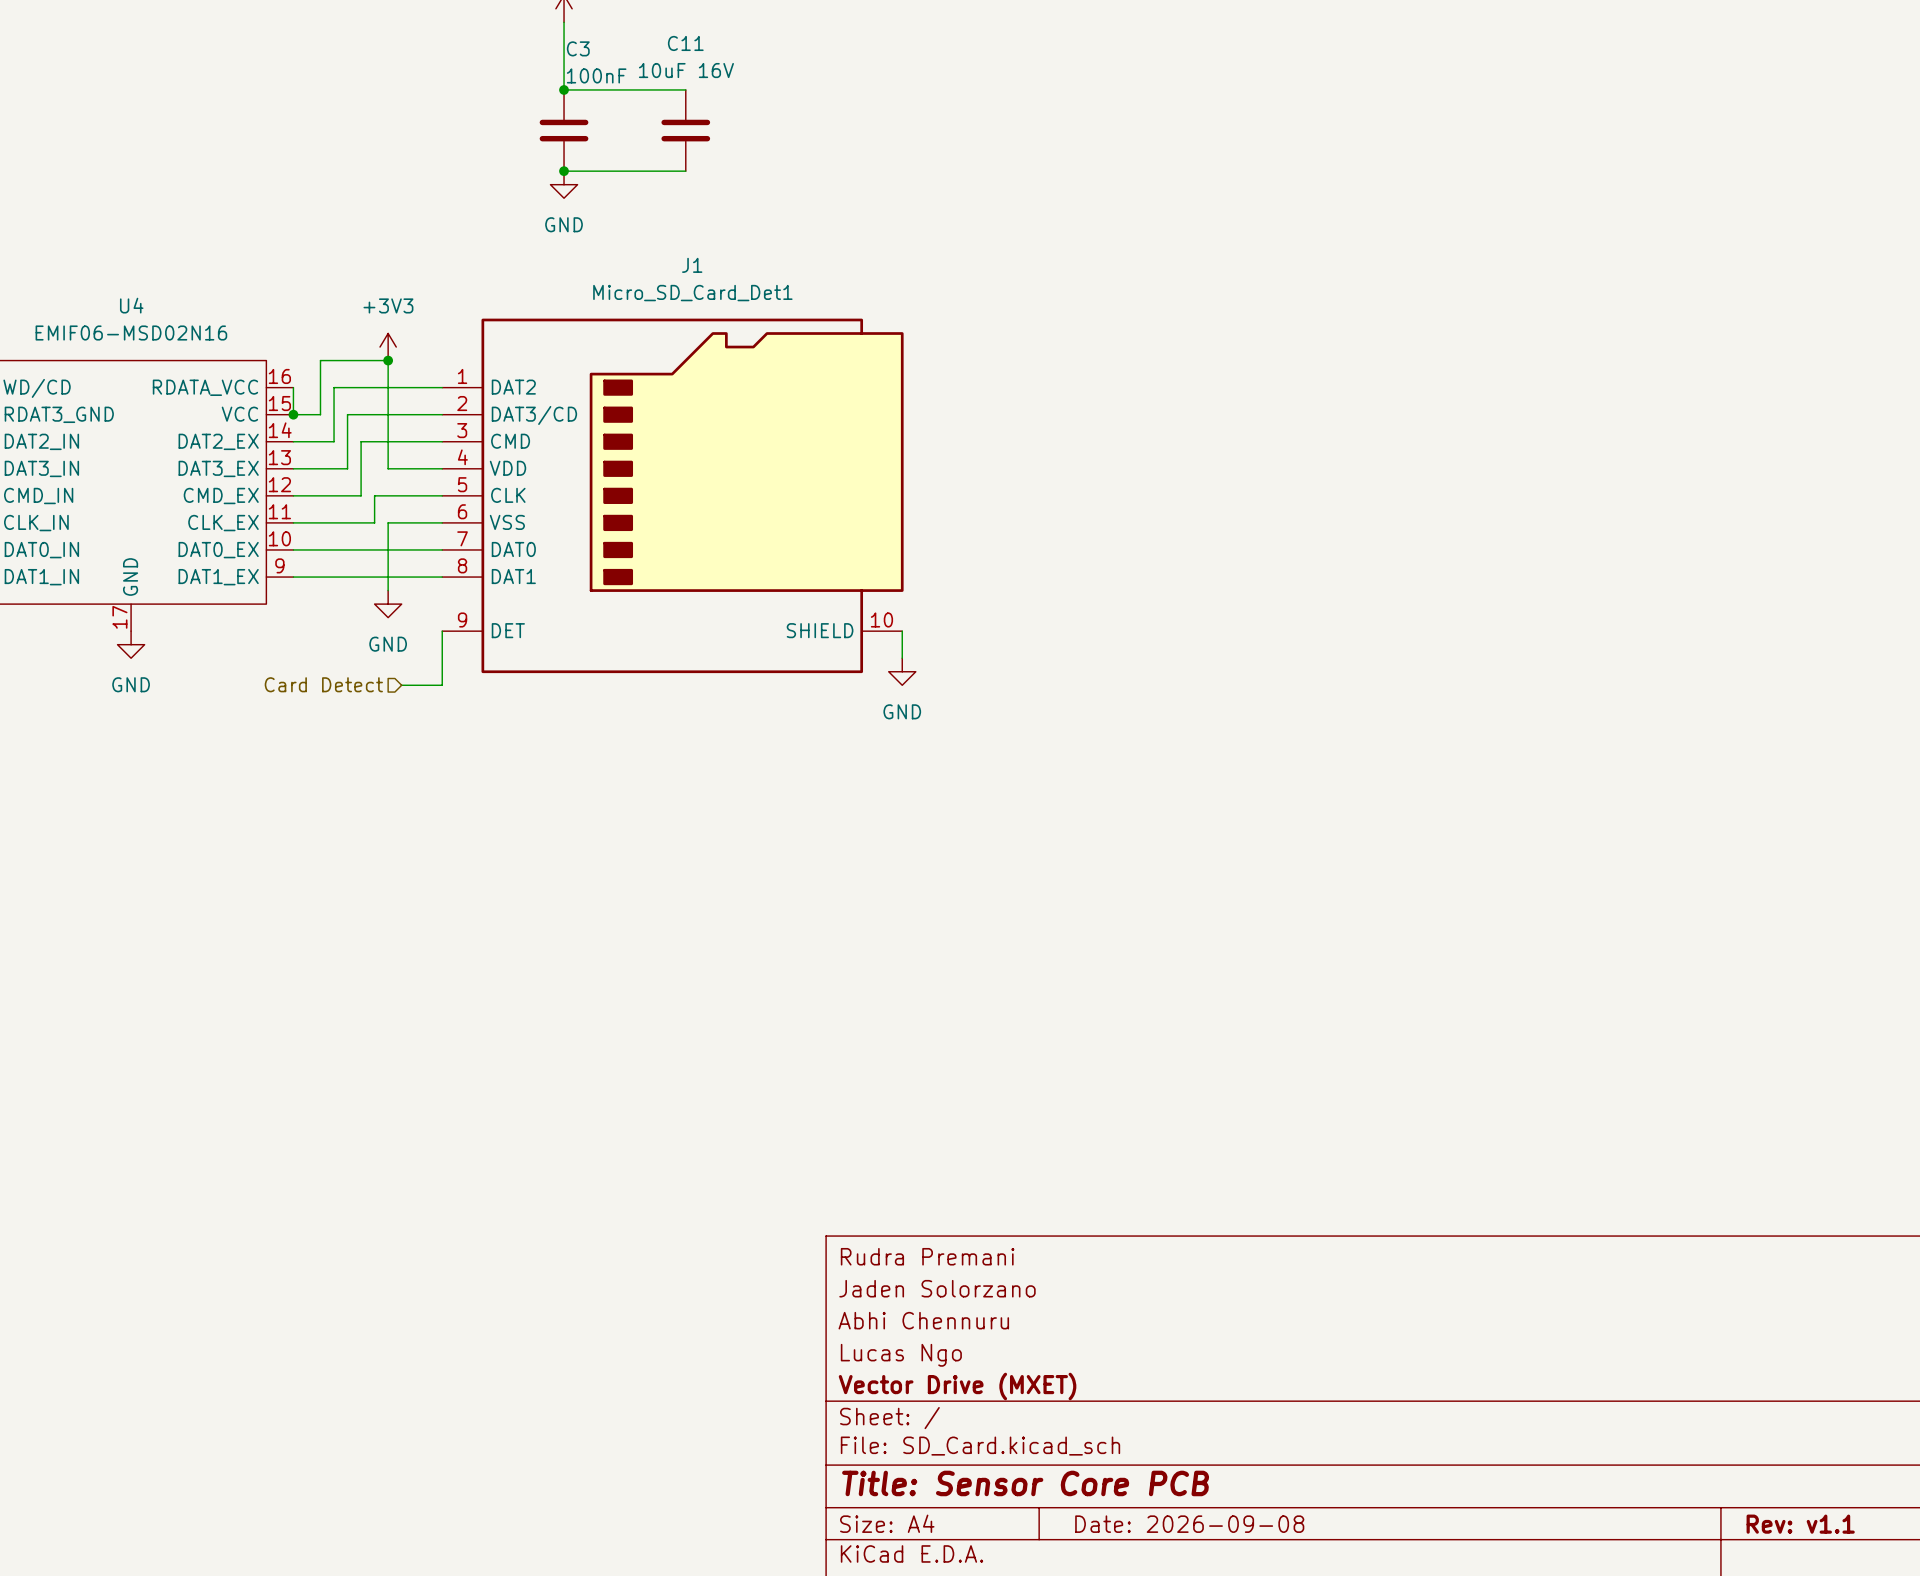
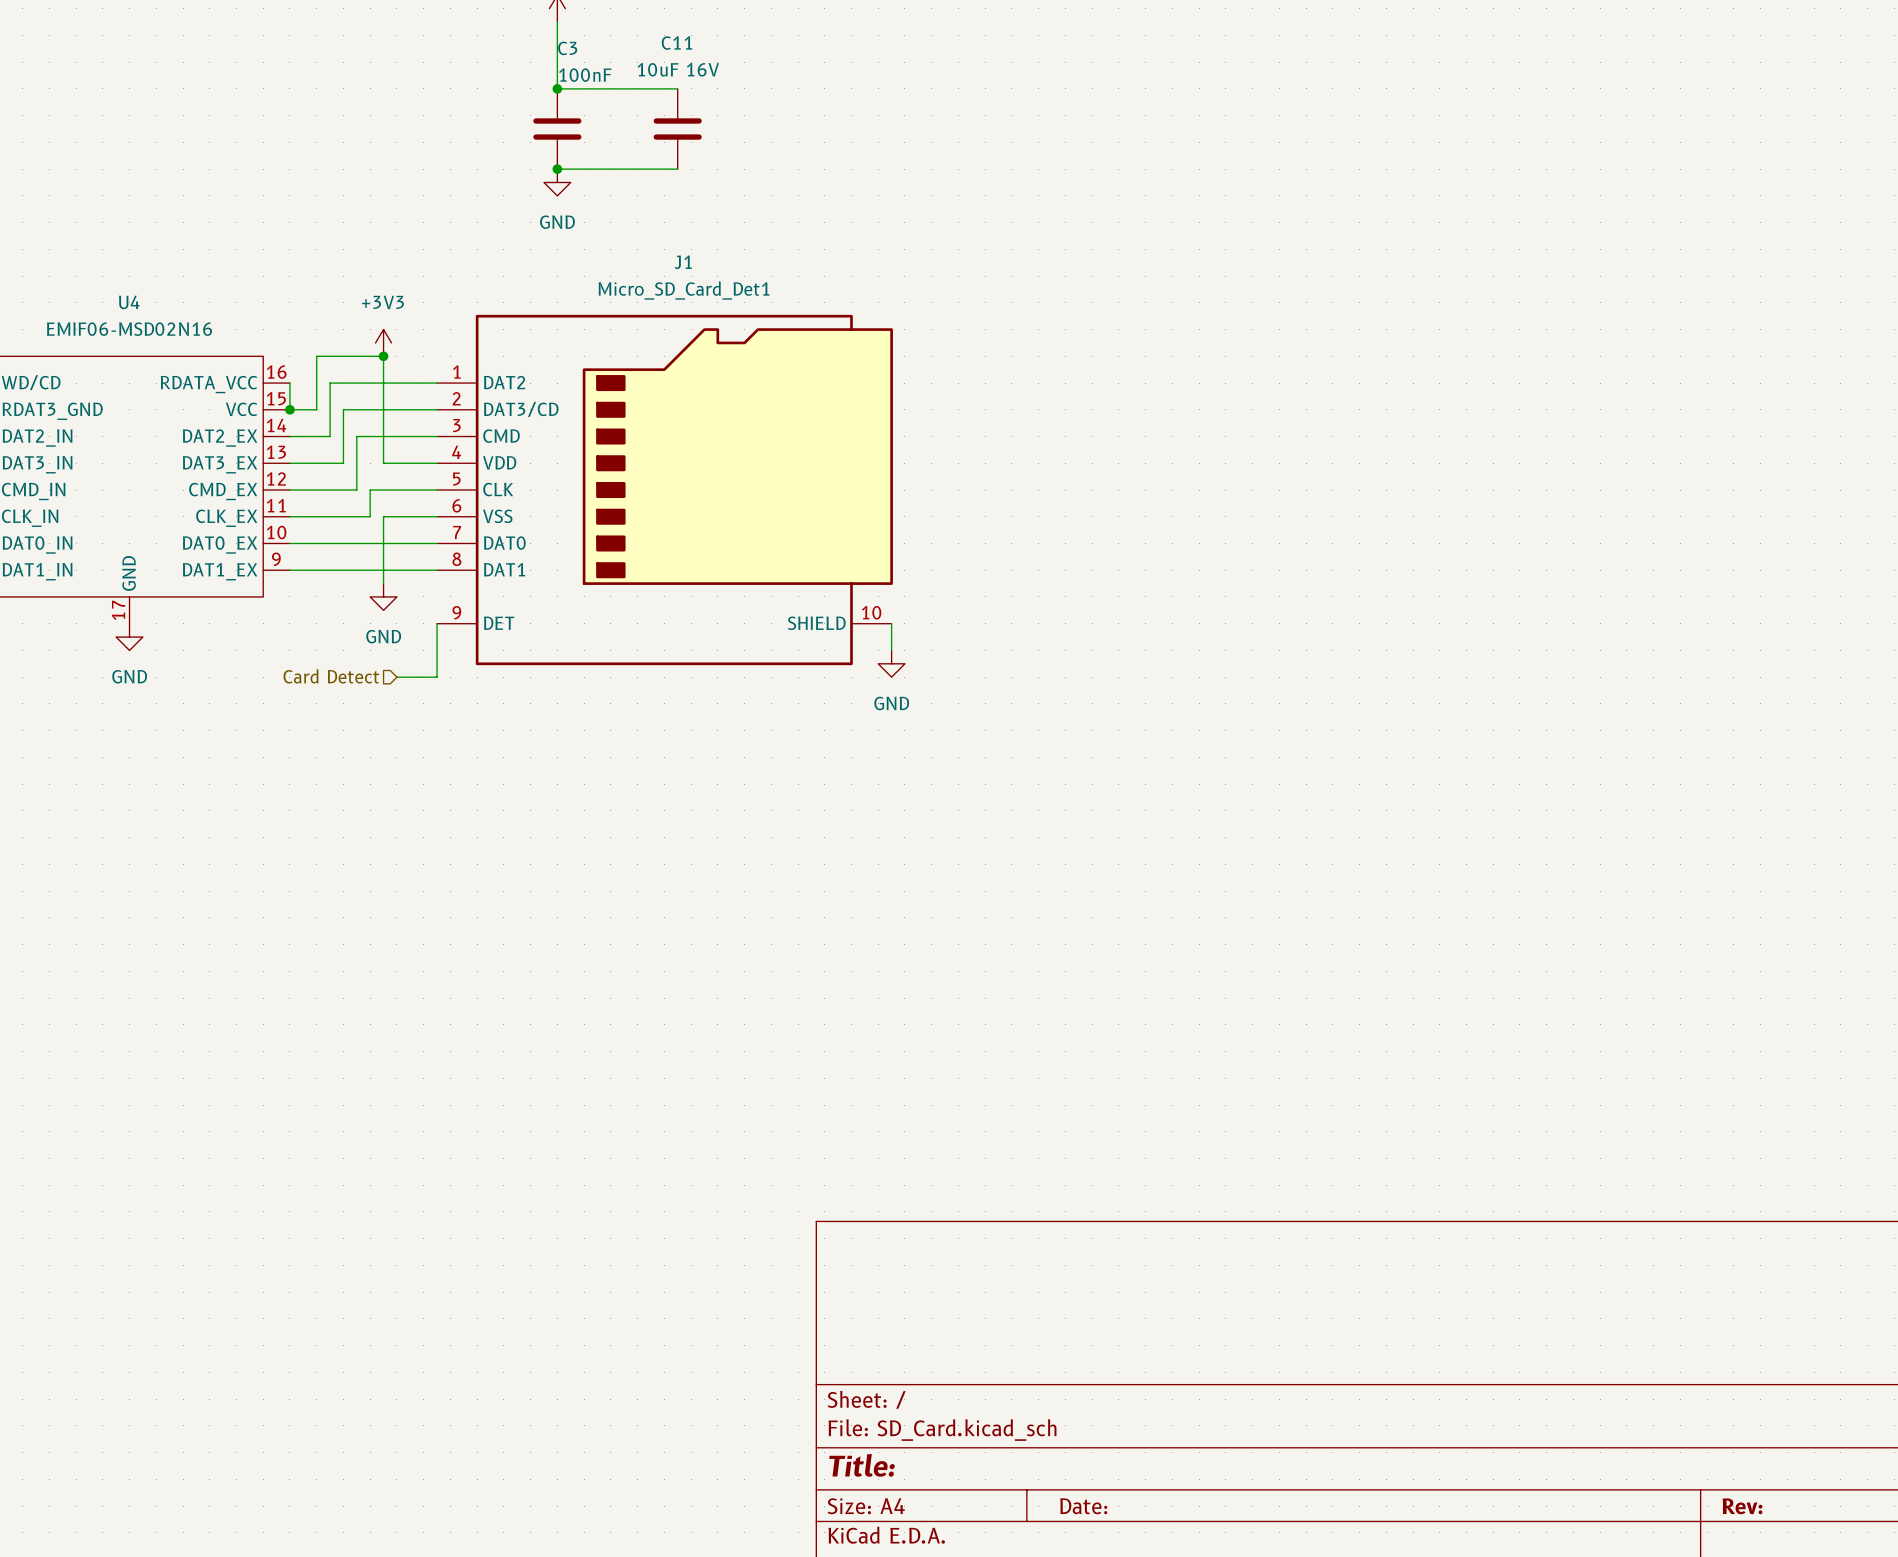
title block: Rudra Premani (927, 1256) -> none
title block: Jaden Solorzano (937, 1288) -> none
title block: Abhi Chennuru (923, 1320) -> none
title block: Lucas Ngo (901, 1355) -> none
title block: Vector Drive (MXET) (957, 1386) -> none
title block: Title: Sensor Core PCB (1025, 1483) -> Title: (862, 1465)
title block: Date: 2026-09-08 (1189, 1524) -> Date: (1083, 1506)
title block: Rev: v1.1 (1800, 1524) -> Rev: (1742, 1506)

